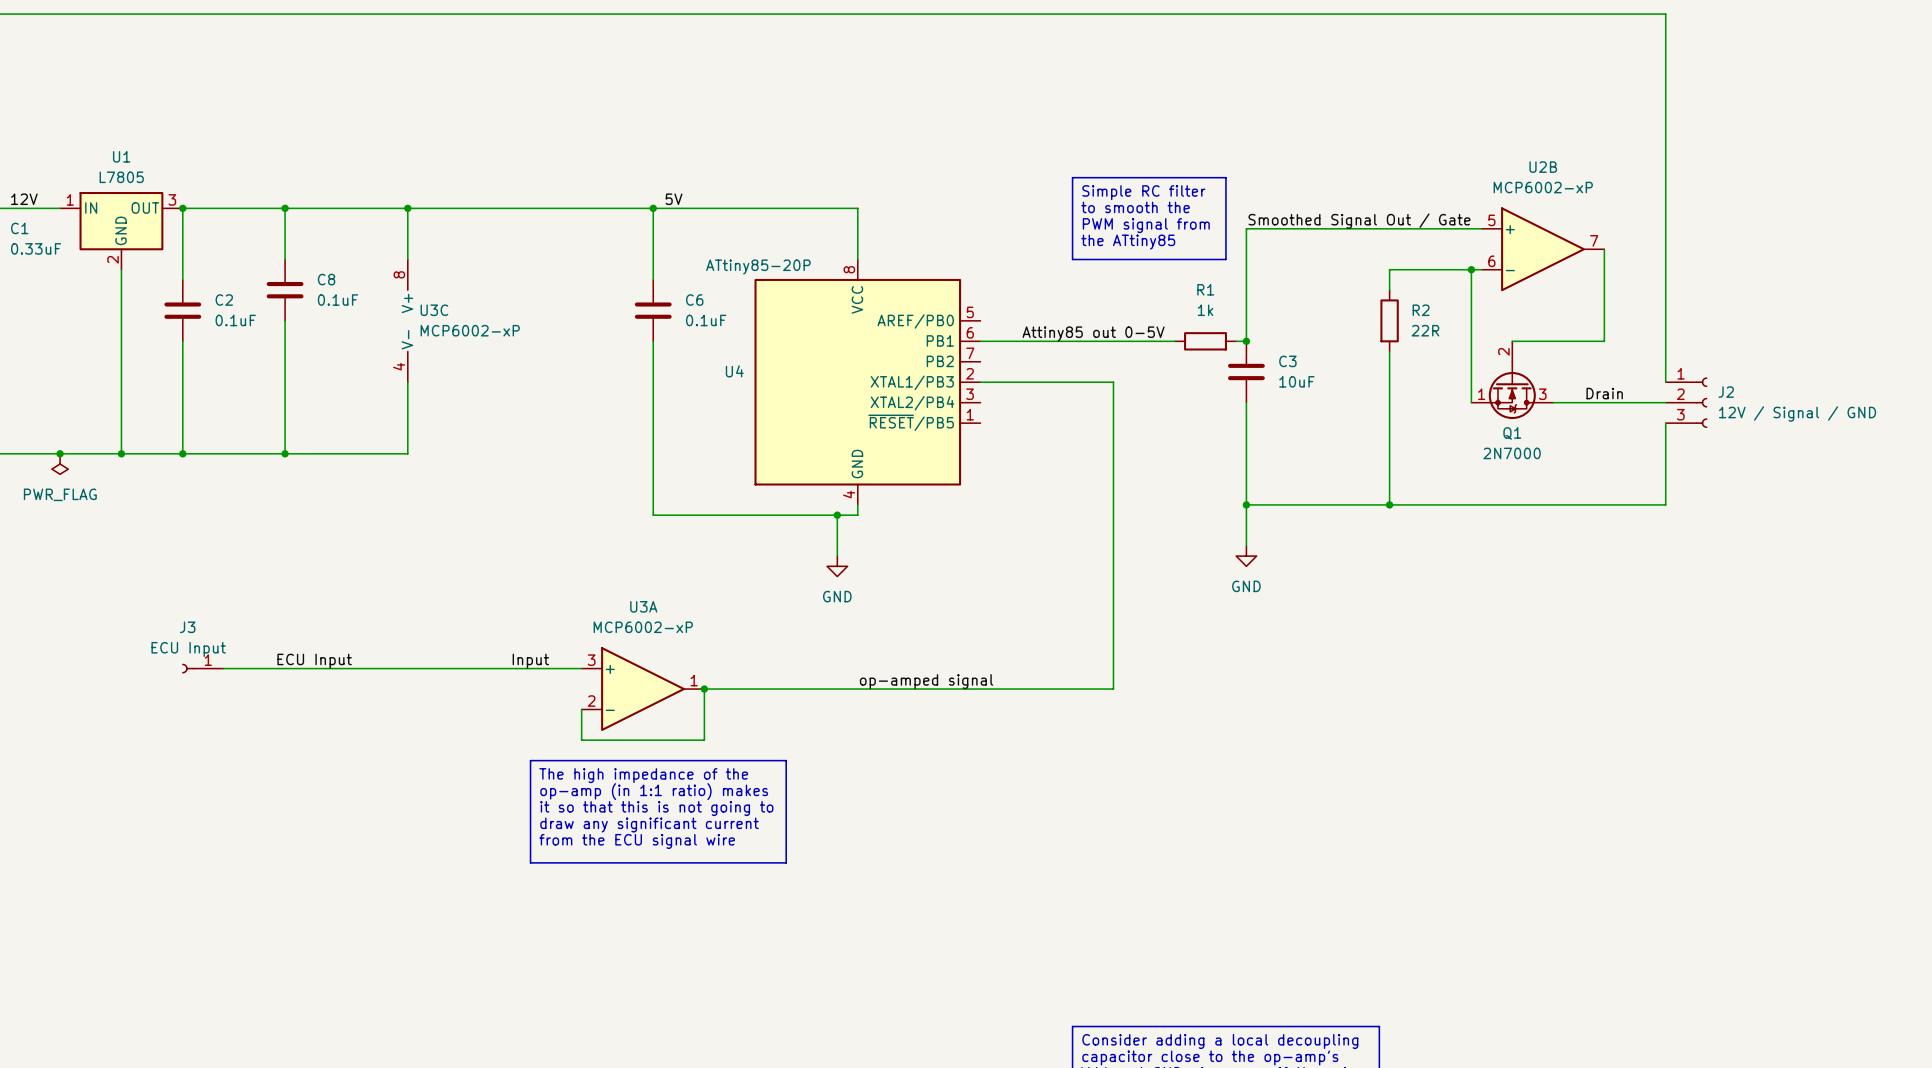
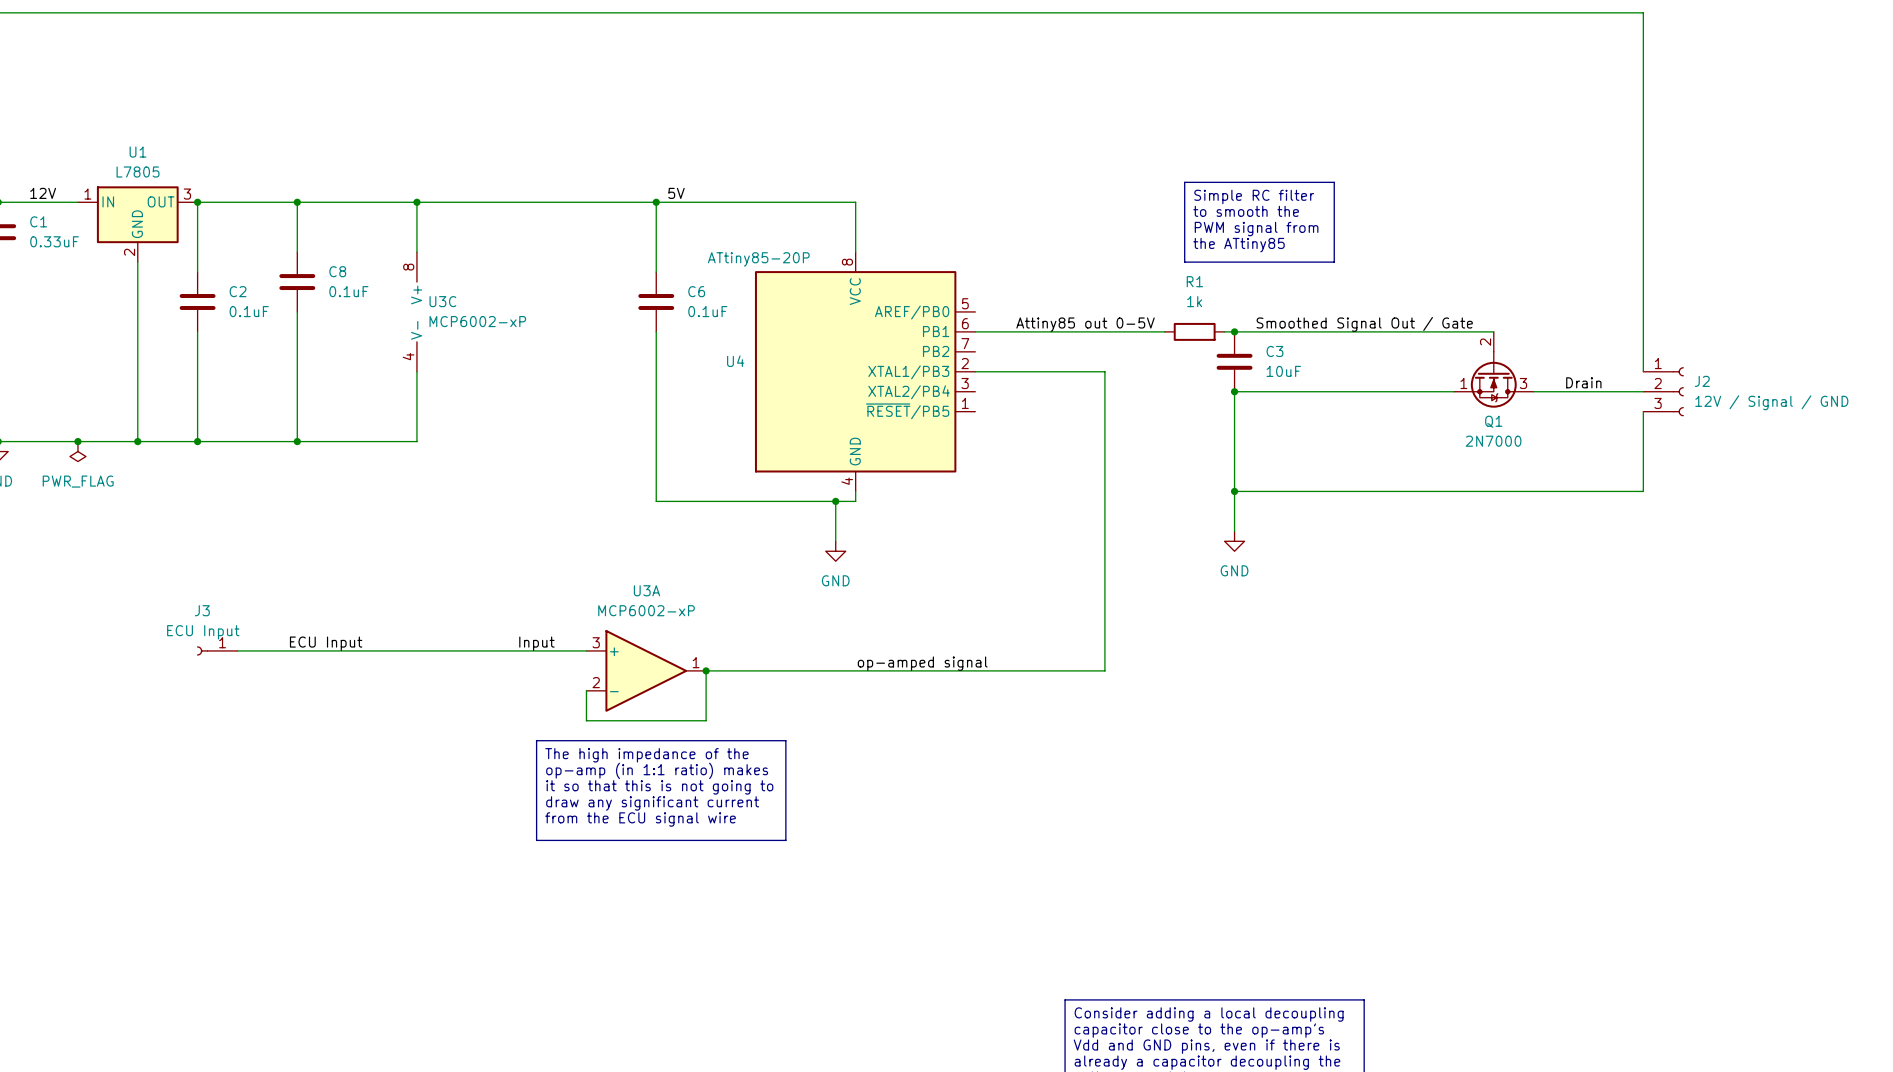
line: (1072, 177) (1225, 177) (1225, 259) (1072, 259) (1072, 177) -> (1184, 182) (1334, 182) (1334, 262) (1184, 262) (1184, 182)
text position: Simple RC filter (1143, 192) -> Simple RC filter (1254, 196)
text position: to smooth the (1135, 207) -> to smooth the (1246, 211)
label position: Smoothed Signal Out / Gate (1359, 221) -> Smoothed Signal Out / Gate (1364, 324)
text position: PWM signal from (1146, 225) -> PWM signal from (1256, 229)
wire: (1481, 228) (1246, 228) (1246, 341) -> (1493, 331) (1234, 331)
text position: the ATtiny85 (1128, 242) -> the ATtiny85 (1239, 245)
U2B: MCP6002-xP (1543, 249) -> none
wire: (1604, 249) (1604, 341) (1512, 341) -> none
wire: (1471, 269) (1471, 402) -> (1234, 391) (1453, 391)
junction: (1471, 269) -> none
wire: (1481, 269) (1389, 269) (1389, 290) -> none
R2: 22R (1389, 320) -> none
wire: (1389, 351) (1389, 504) -> none
junction: none -> (1234, 391)
junction: (1389, 504) -> none

